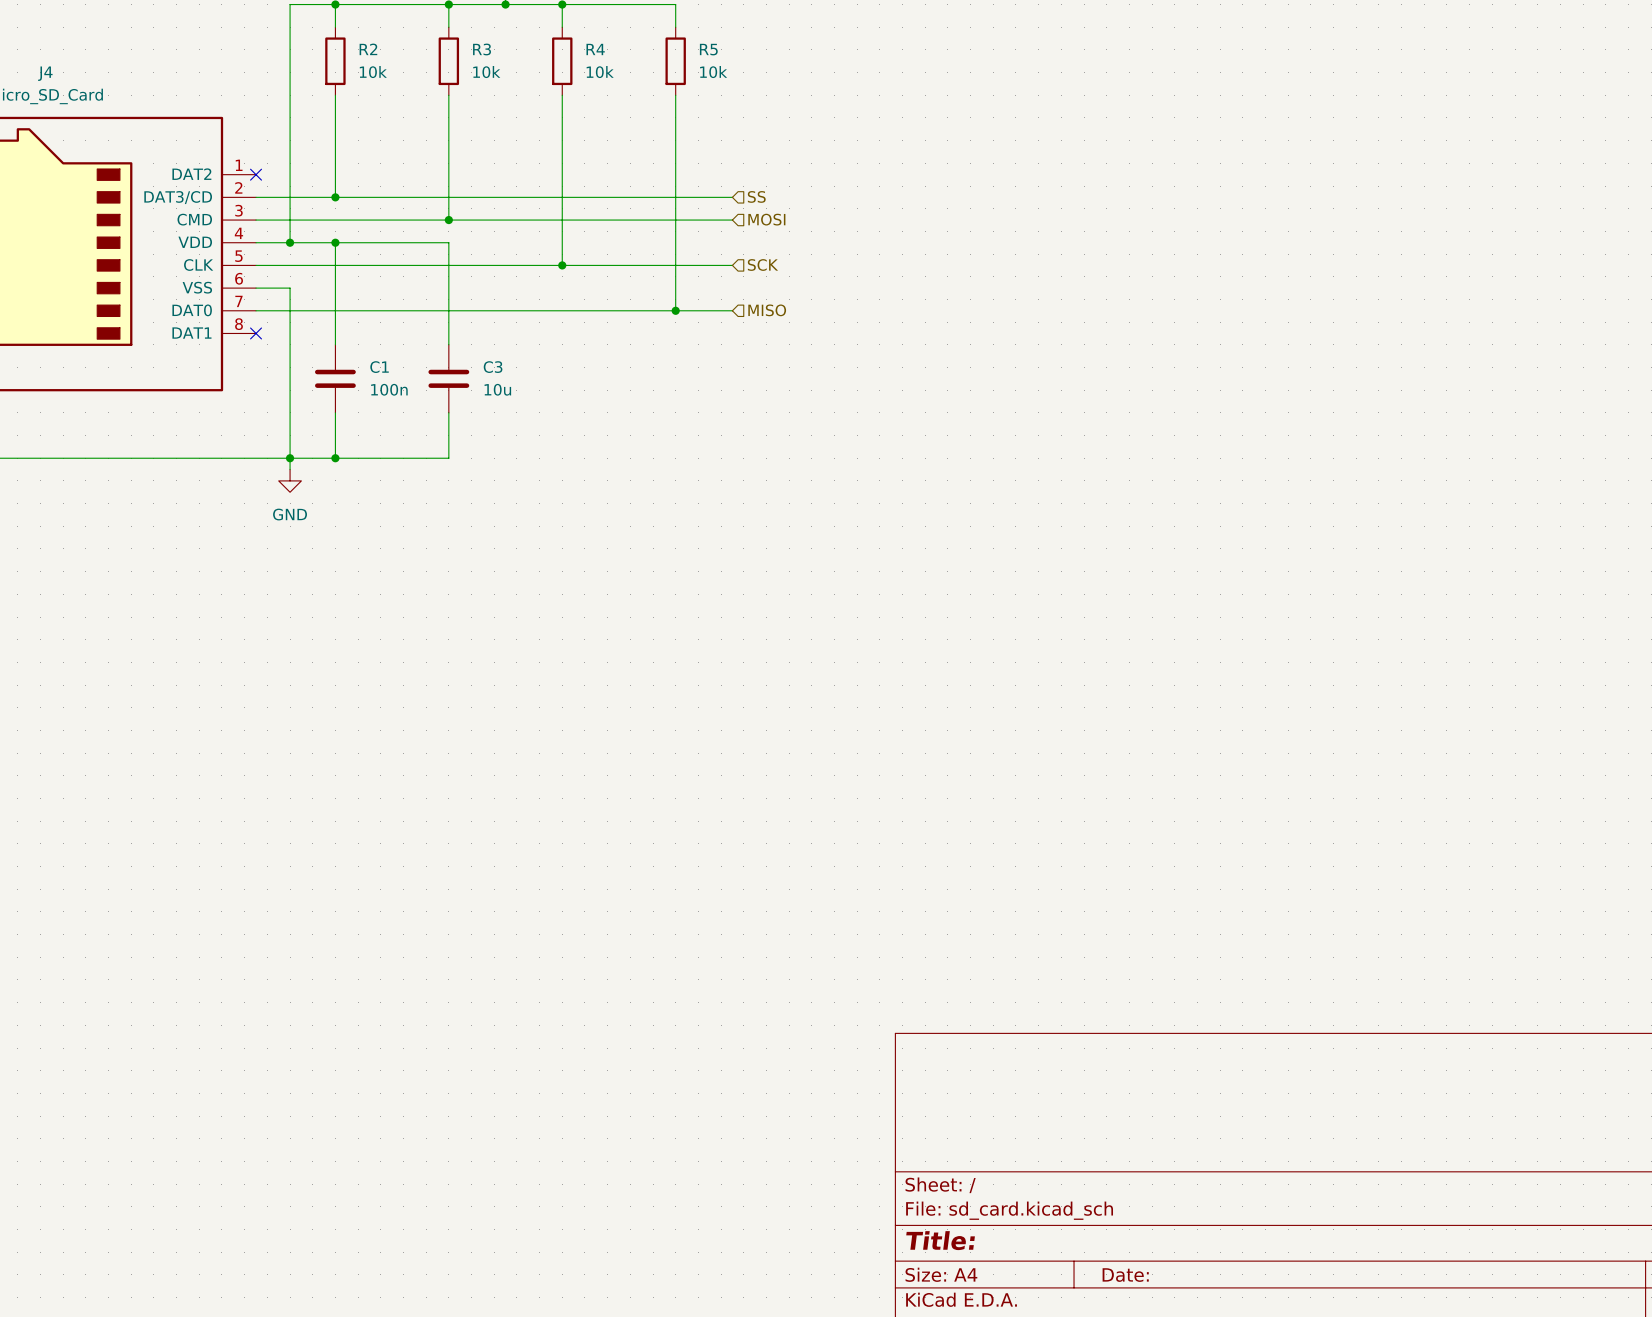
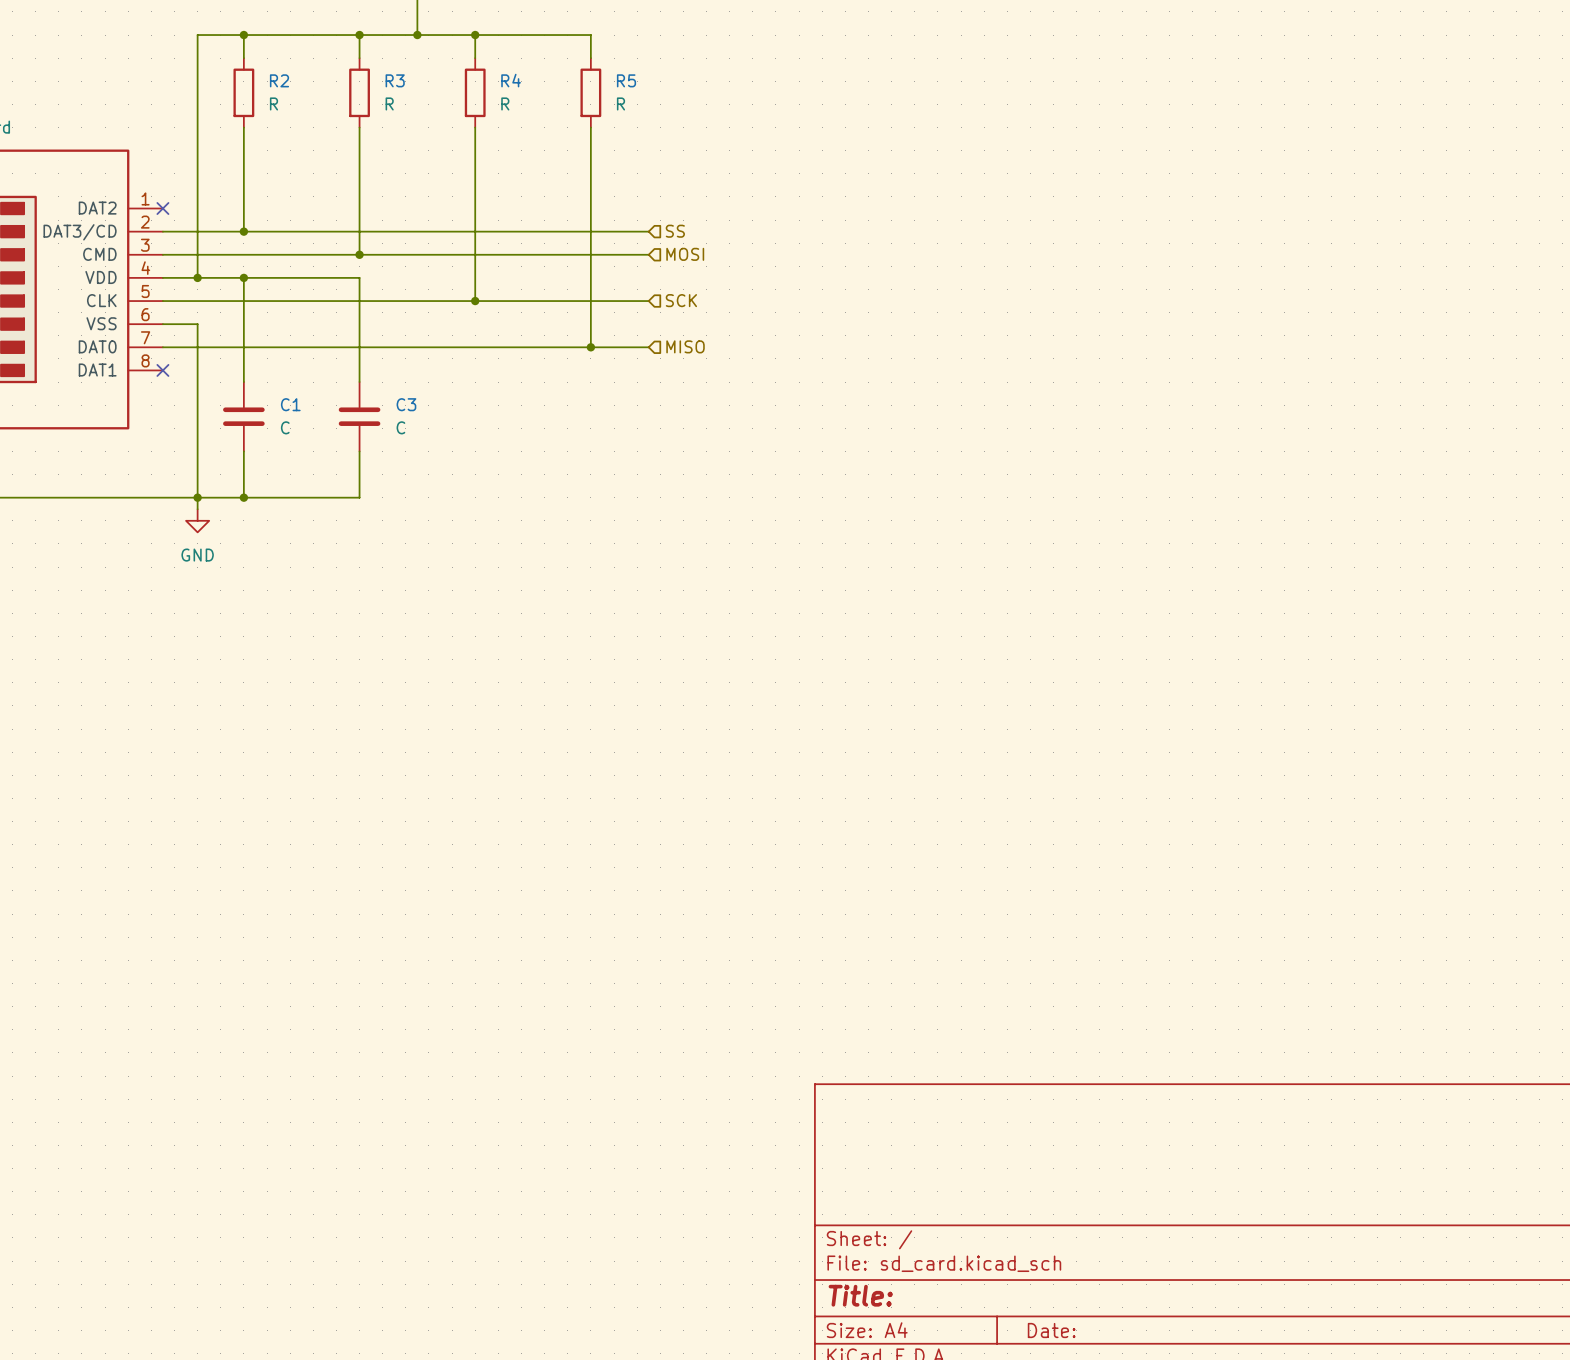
R2 value: 10k (373, 72) -> R (273, 103)
R3 value: 10k (486, 72) -> R (389, 103)
R4 value: 10k (600, 72) -> R (505, 103)
R5 value: 10k (713, 72) -> R (620, 103)
C1 value: 100n (389, 389) -> C (285, 427)
C3 value: 10u (497, 389) -> C (400, 427)

